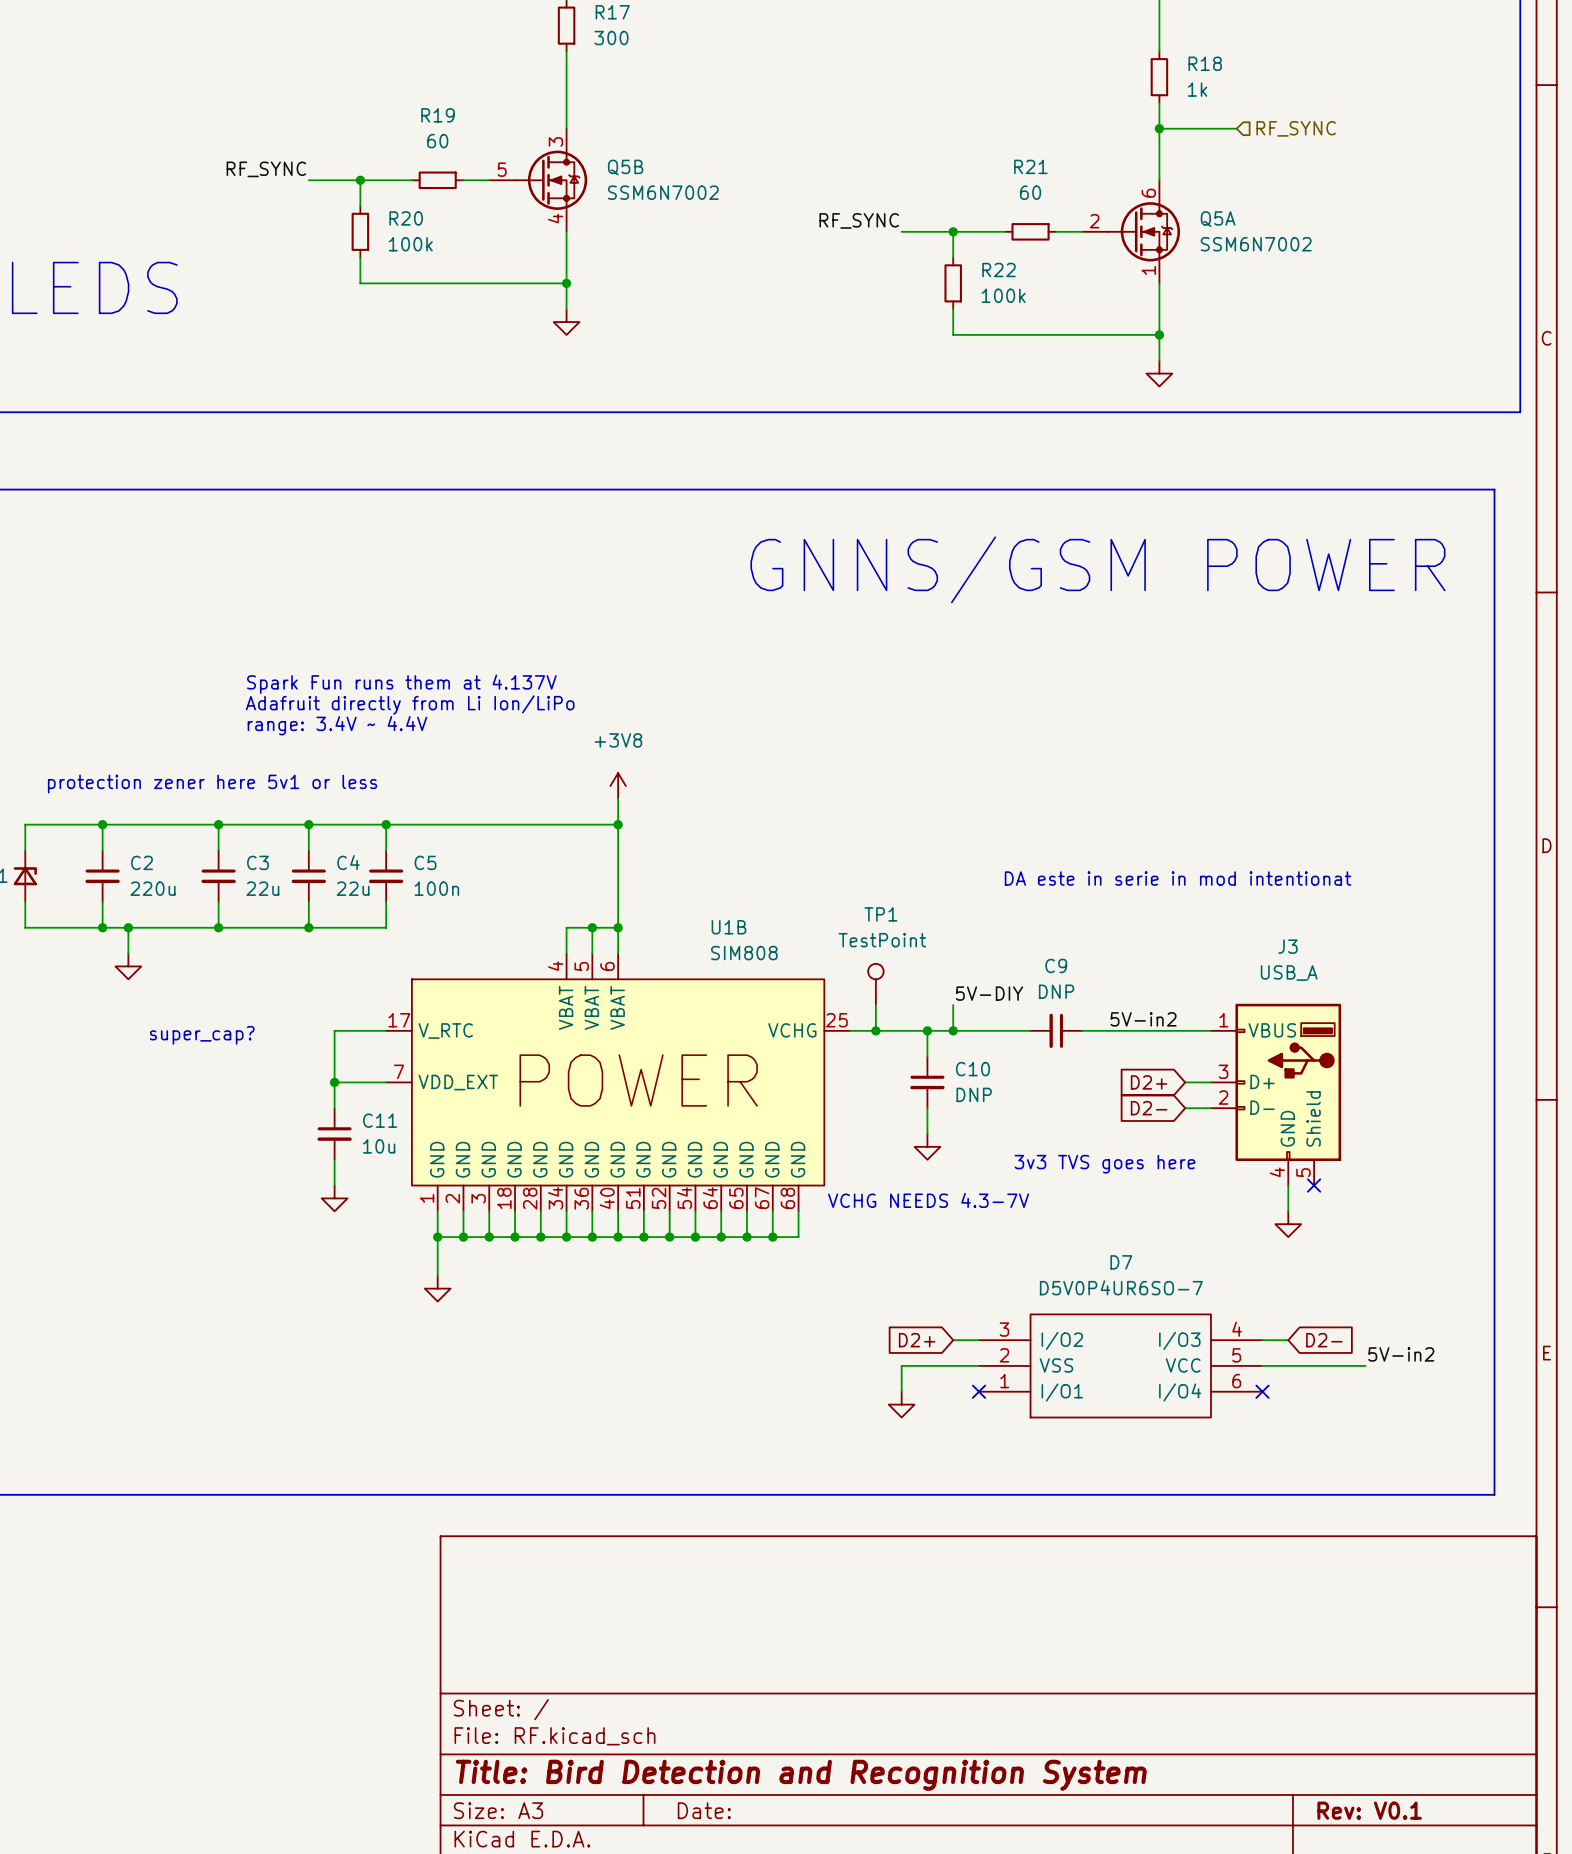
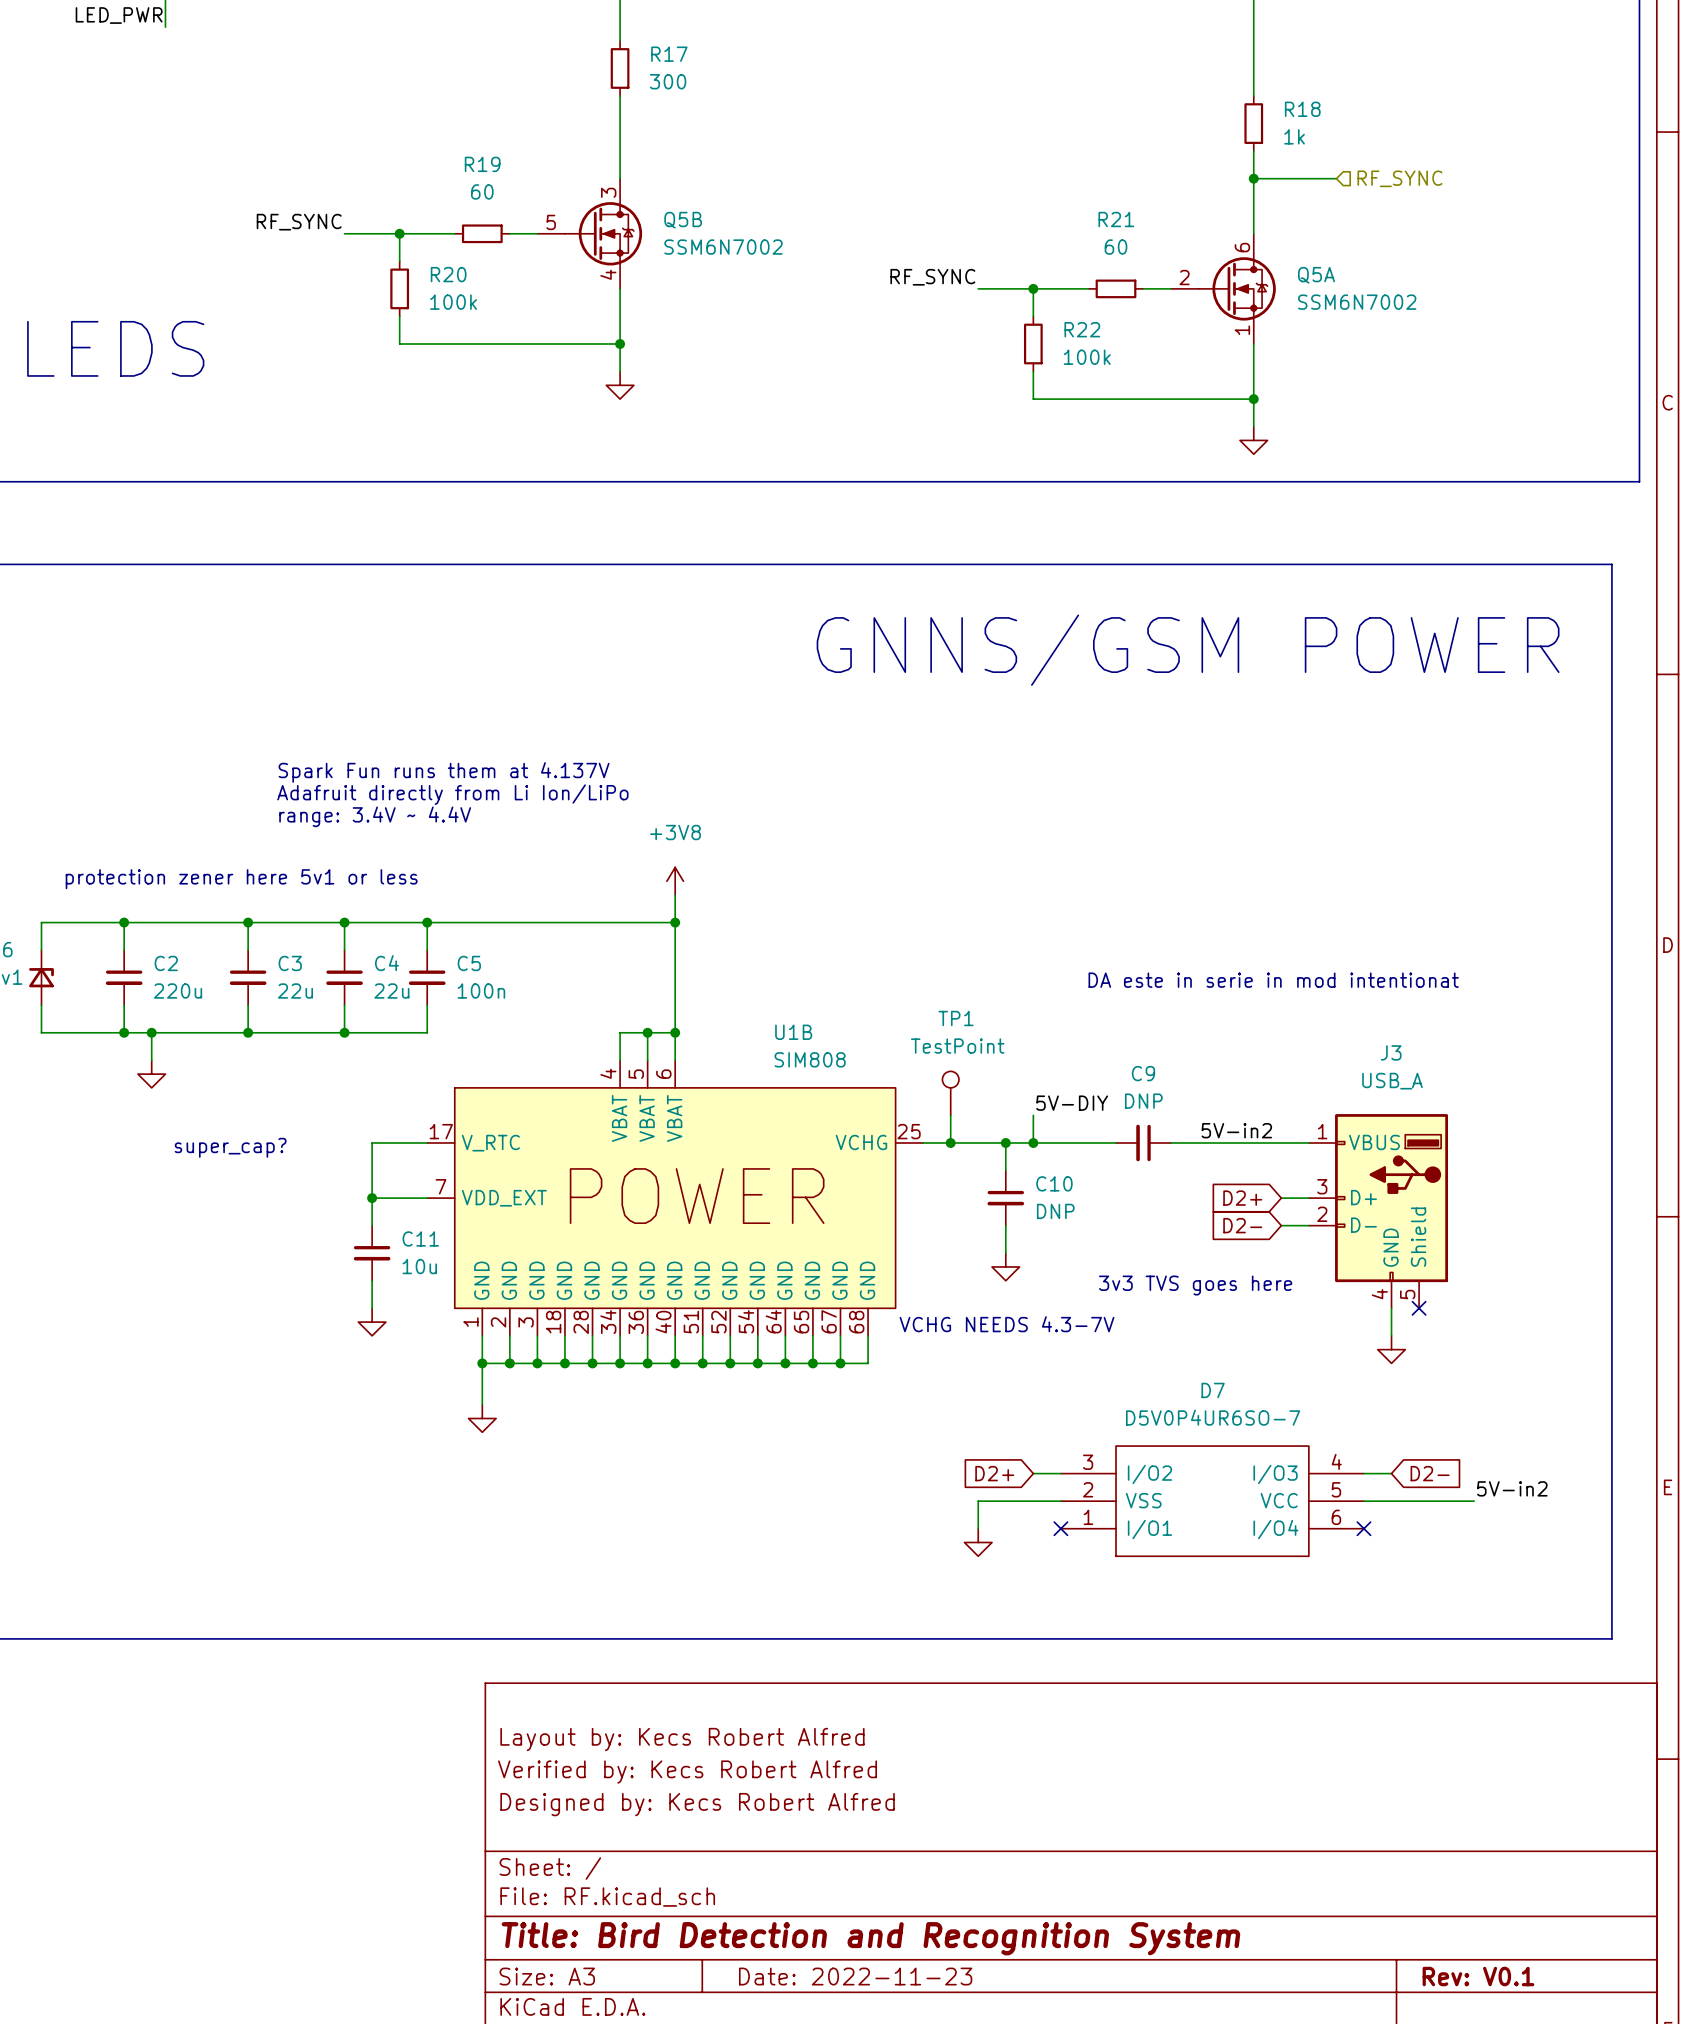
title block: none -> Layout by: Kecs Robert Alfred (682, 1739)
title block: none -> Verified by: Kecs Robert Alfred (687, 1772)
title block: none -> Designed by: Kecs Robert Alfred (697, 1804)
title block: Date: (704, 1810) -> Date: 2022-11-23 (855, 1976)

